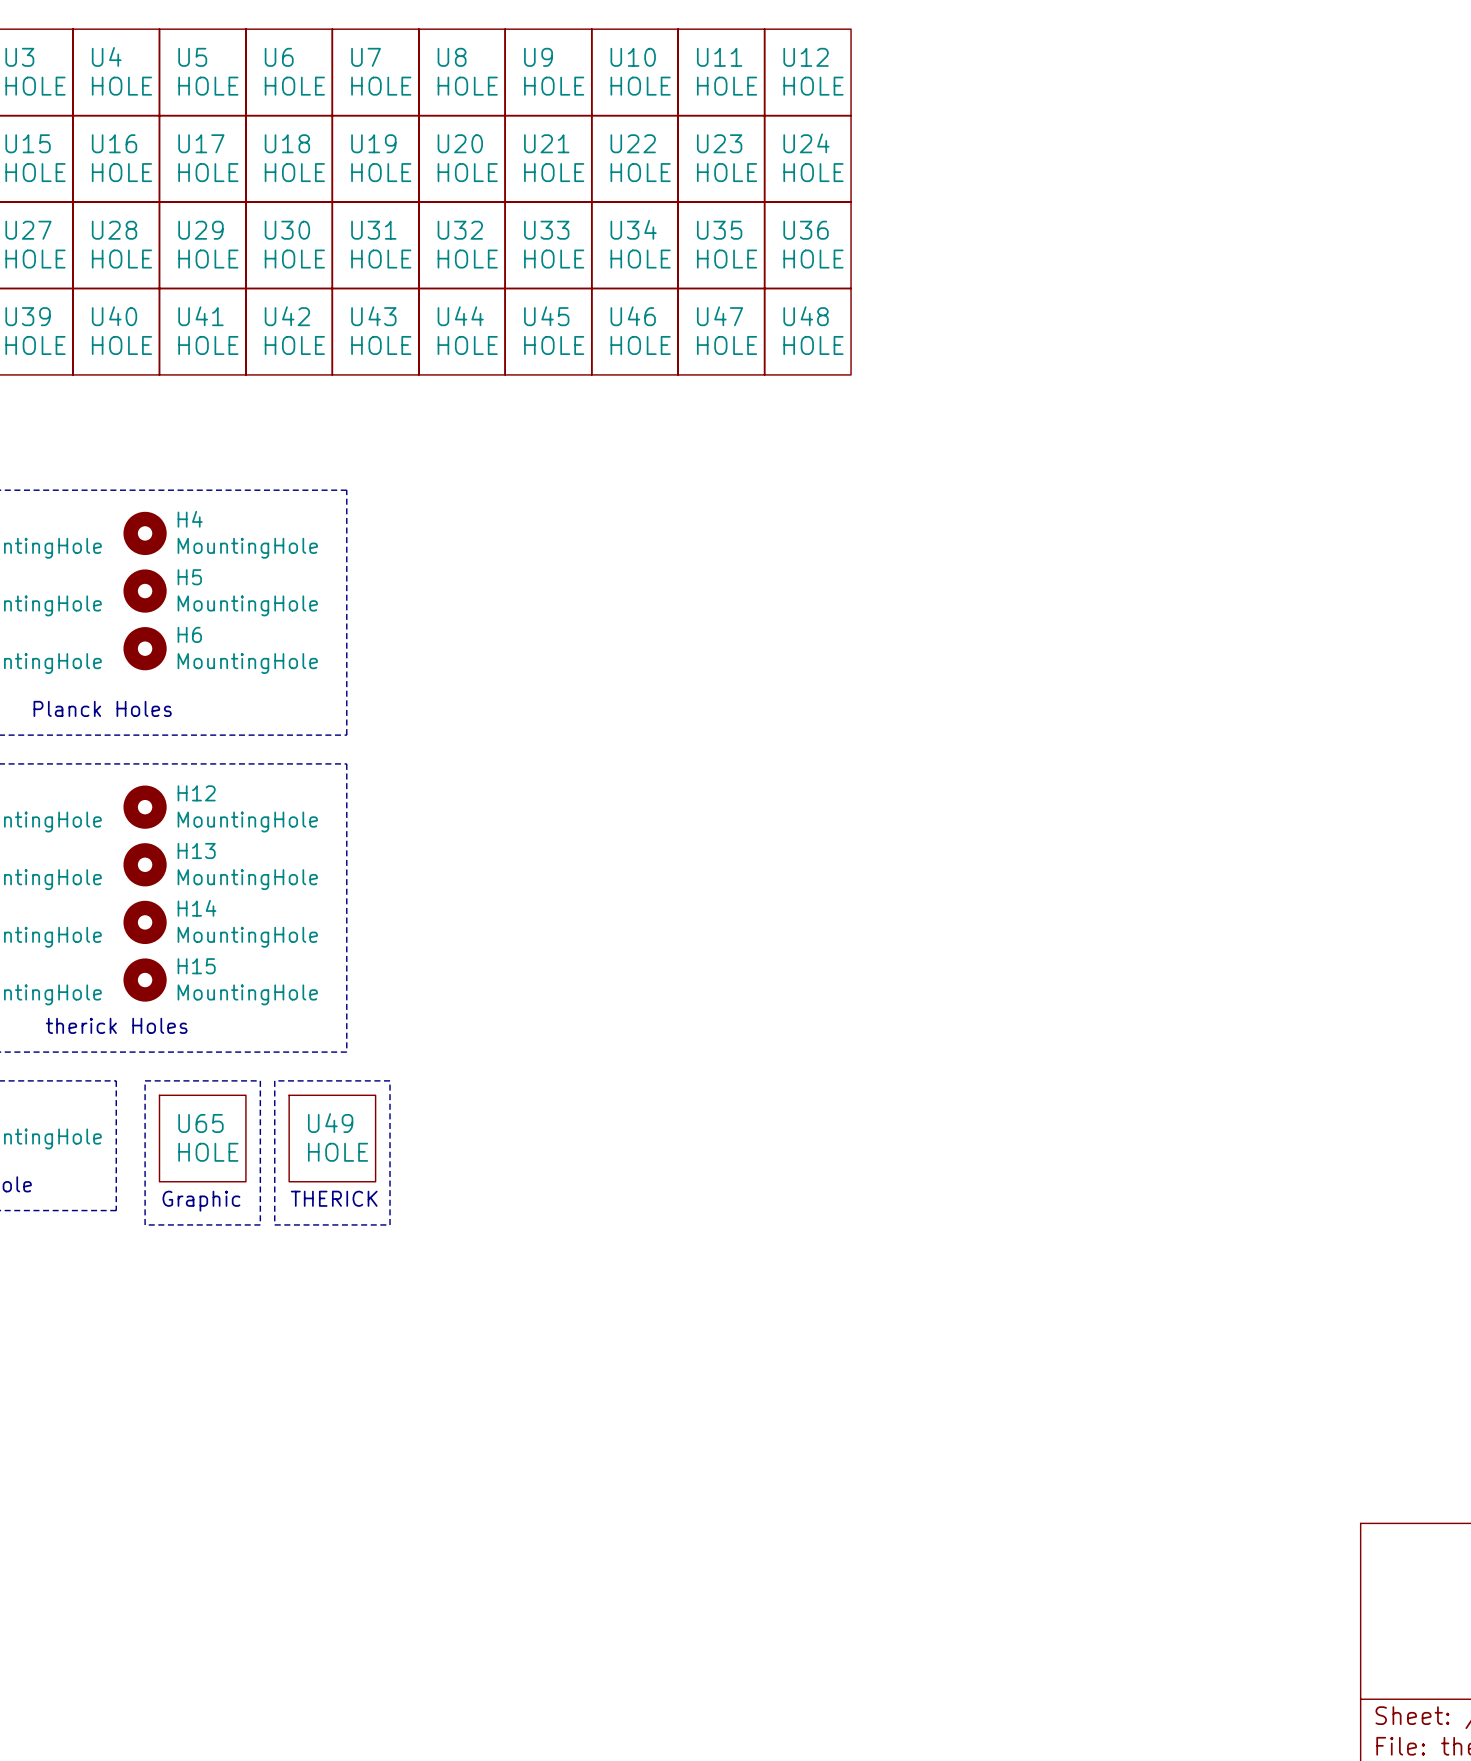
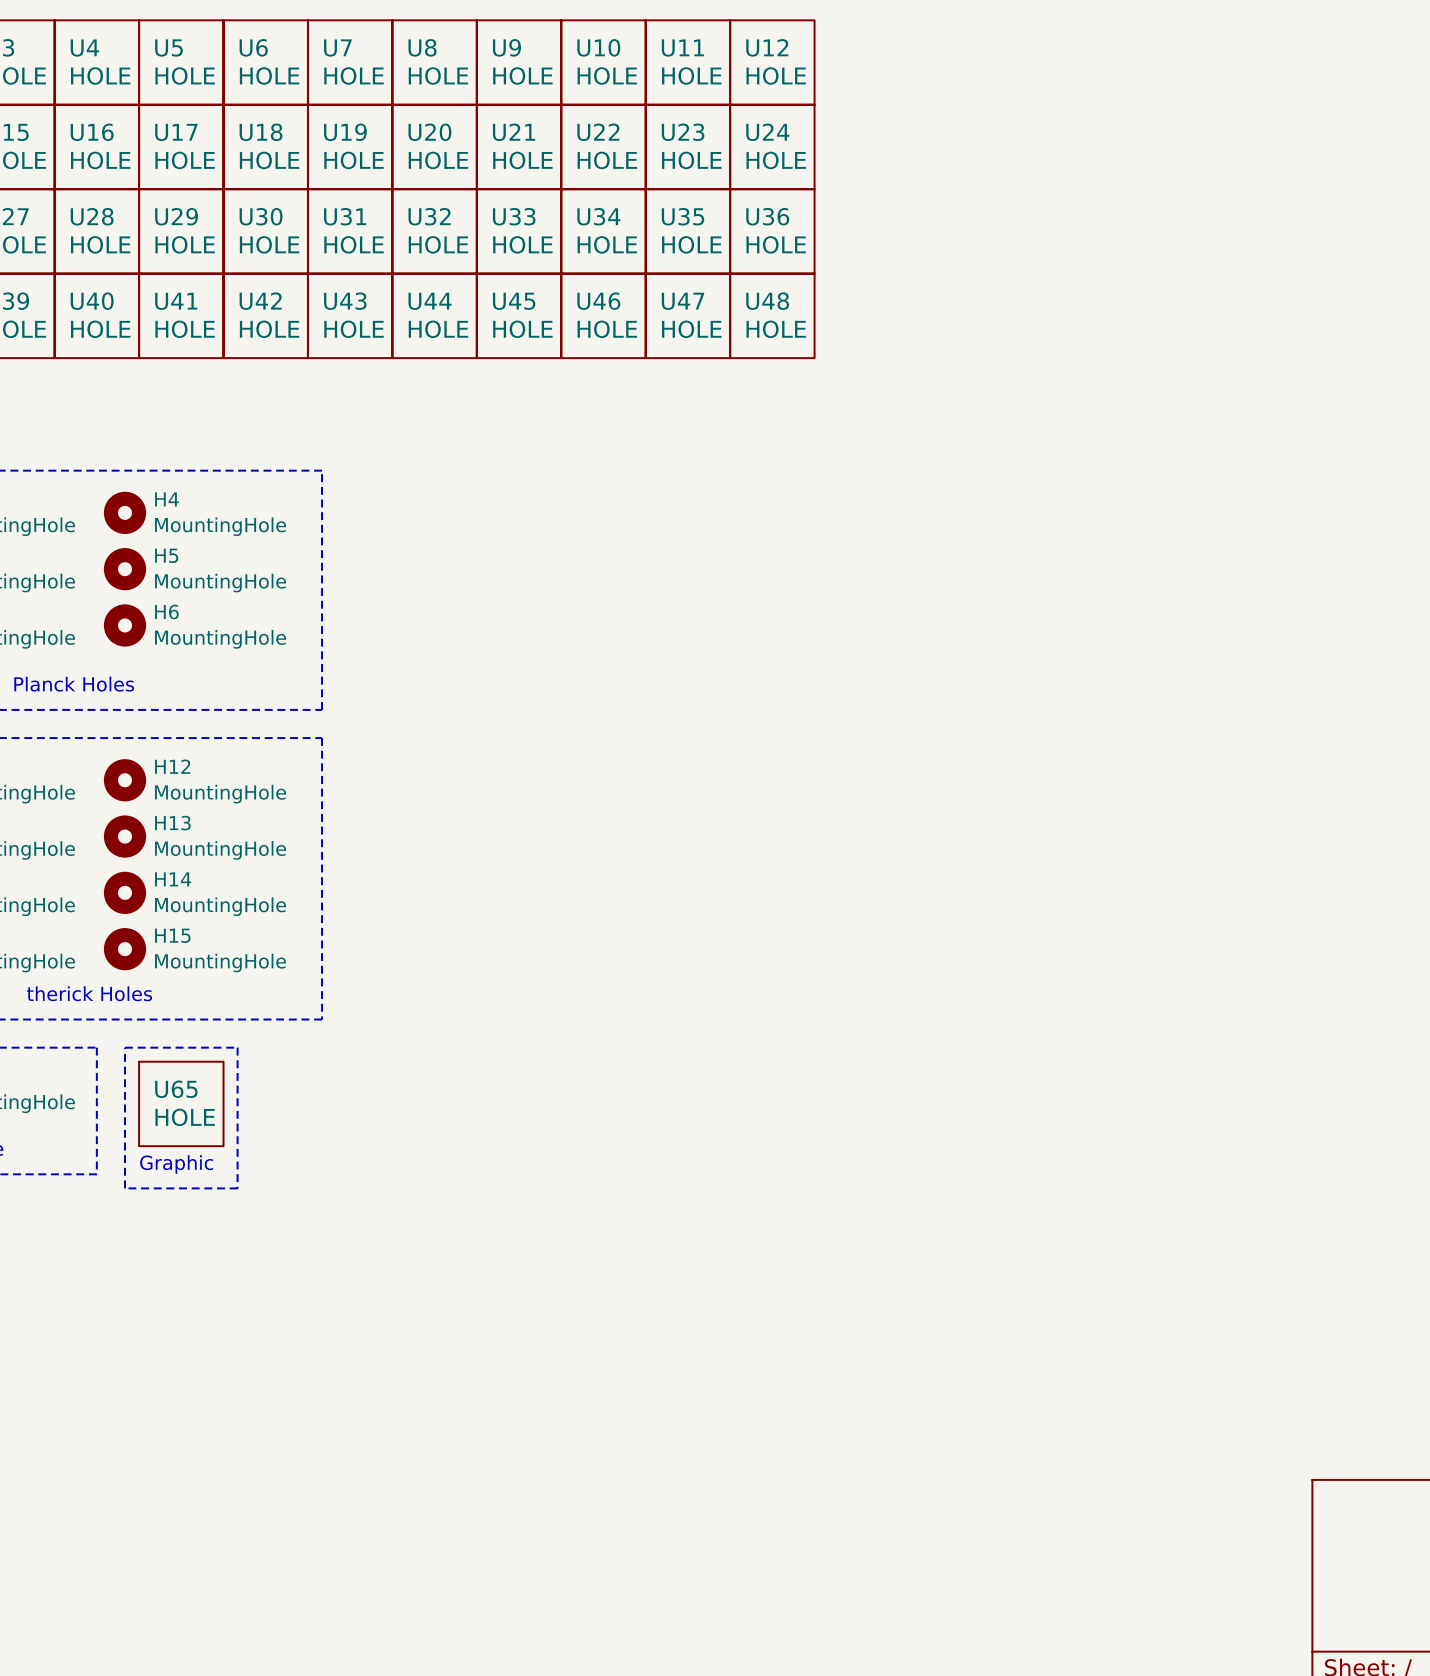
line: (274, 1080) (274, 1224) (390, 1224) (390, 1080) (274, 1080) -> none
U49: HOLE (332, 1138) -> none
text: THERICK (334, 1198) -> none

